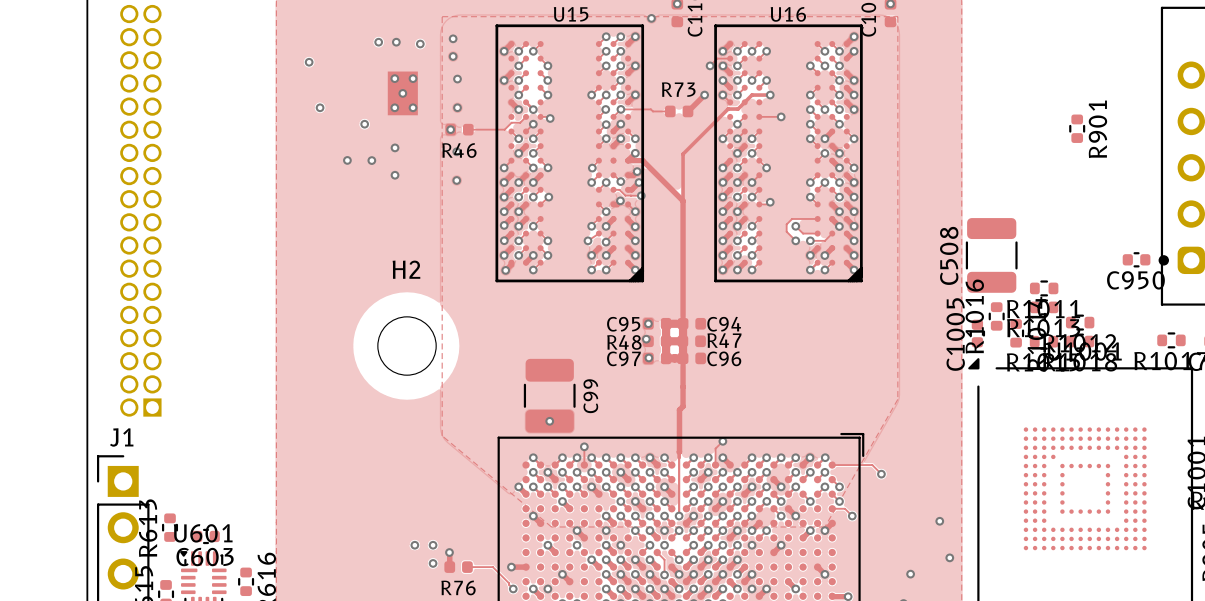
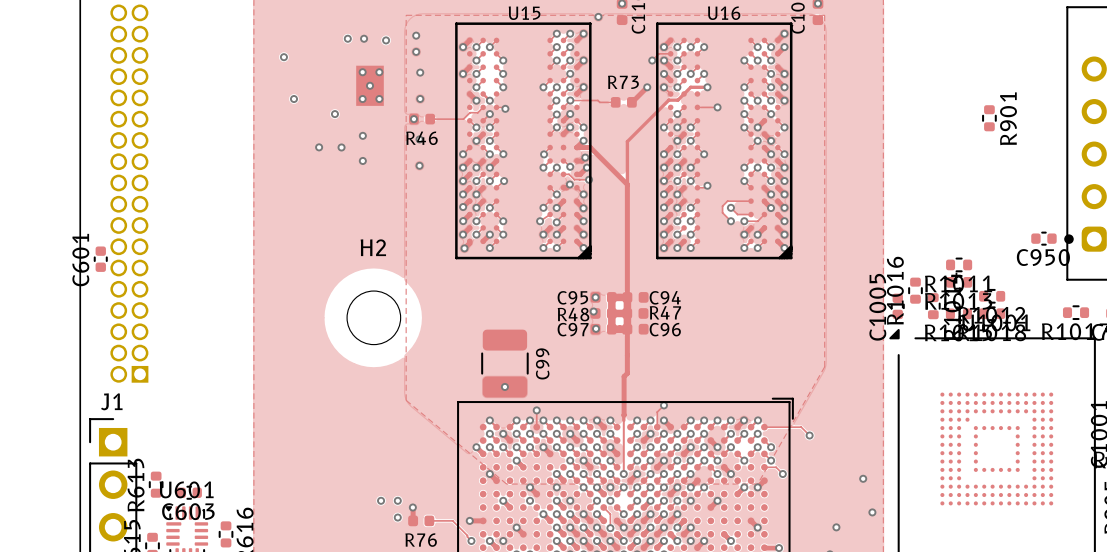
C508: (991, 255) -> none
C601: none -> (100, 259)

